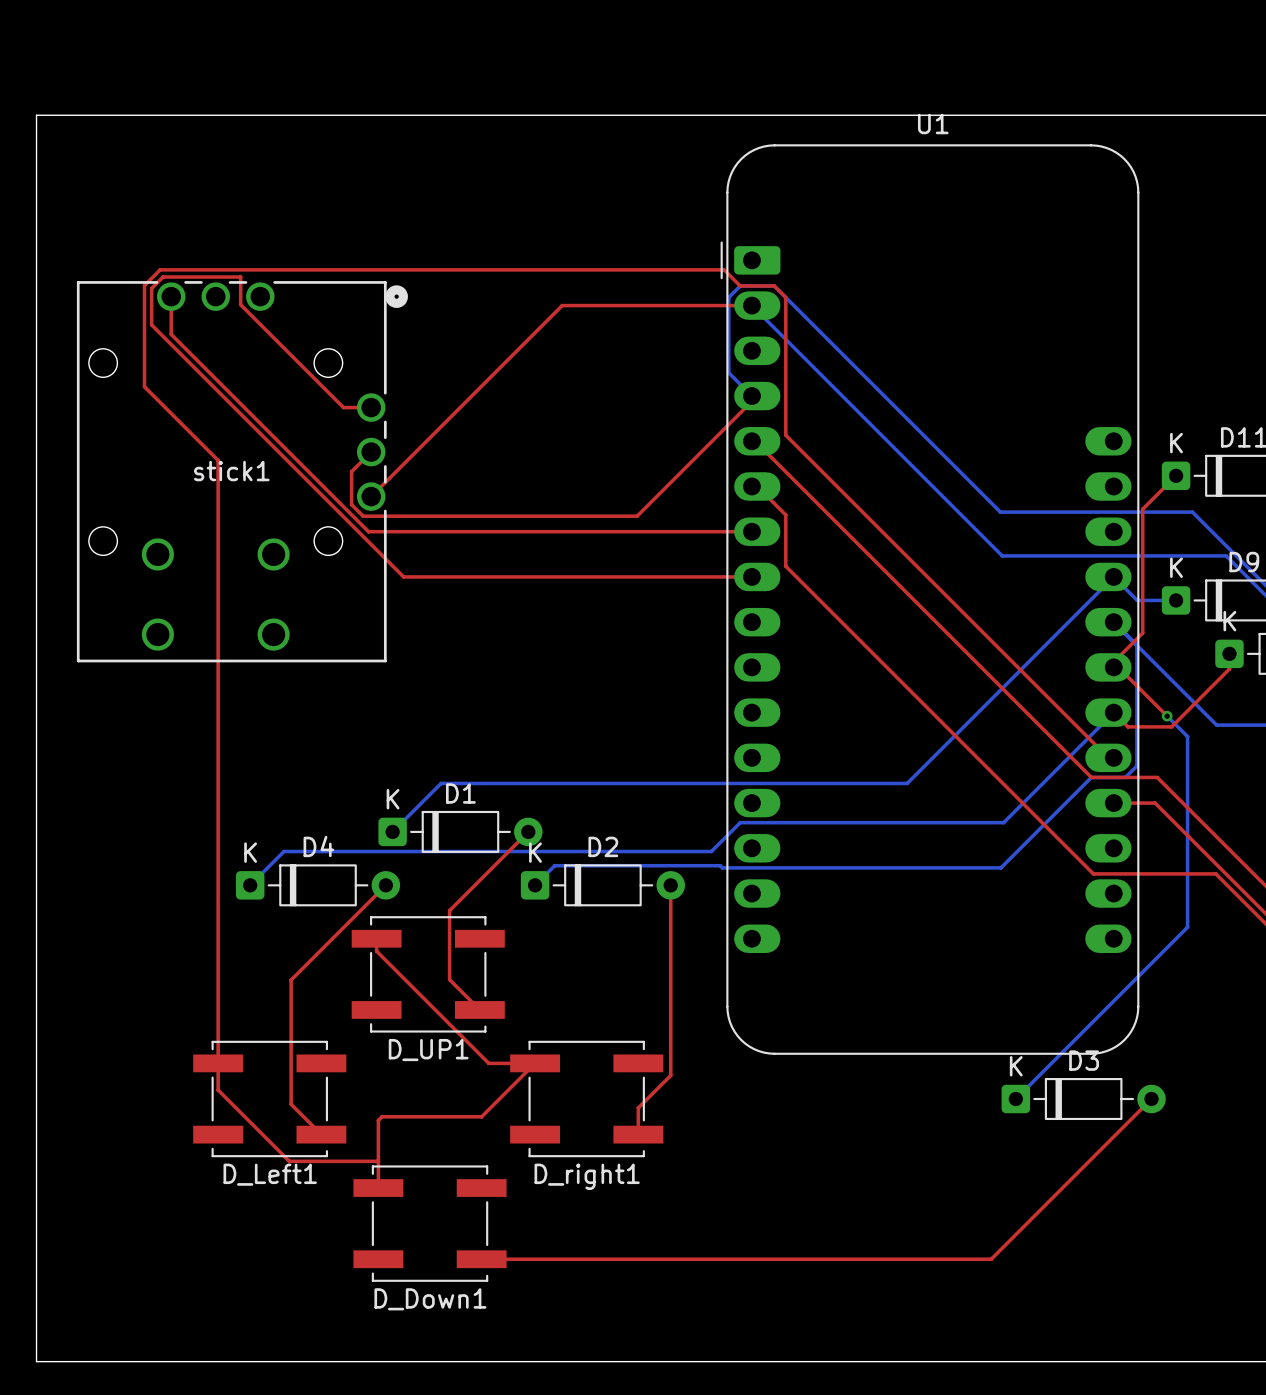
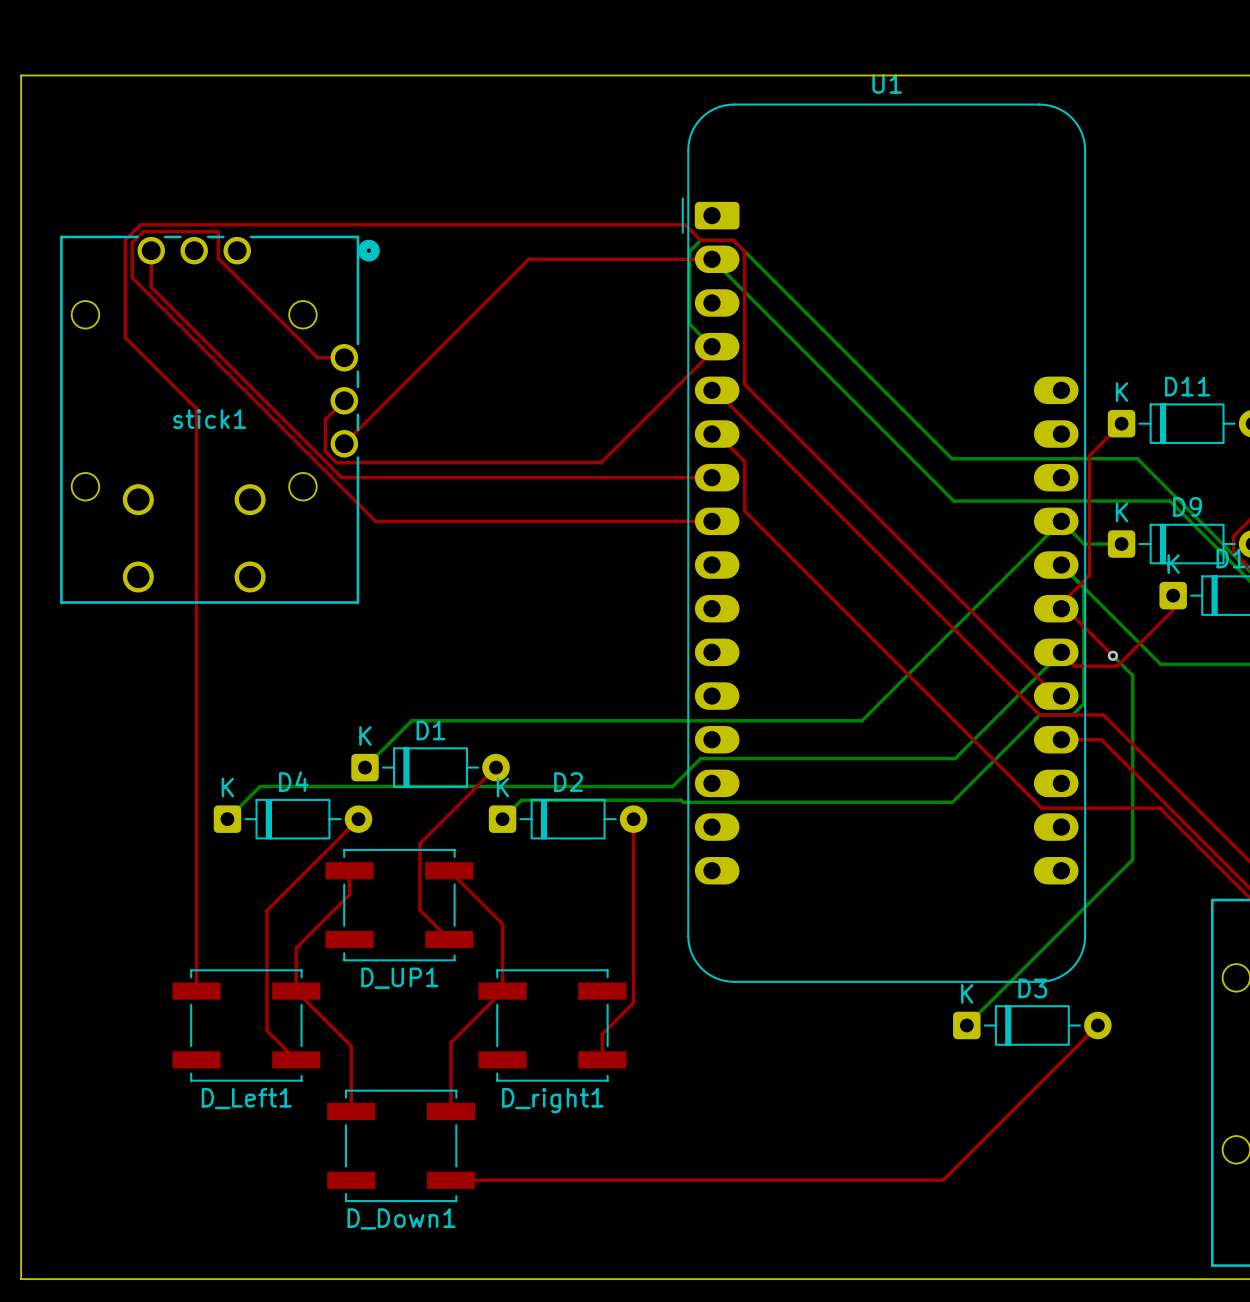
top track: (376, 951) (488, 1063) (535, 1063) -> (449, 870) (502, 924) (502, 991)
top track: none -> (349, 882) (349, 894) (296, 948) (296, 991) (351, 1046)
top track: (218, 1063) (218, 1090) (289, 1161) (378, 1161) -> none
top track: (481, 1116) (381, 1116) (378, 1120) -> (450, 1042) (450, 1111)

